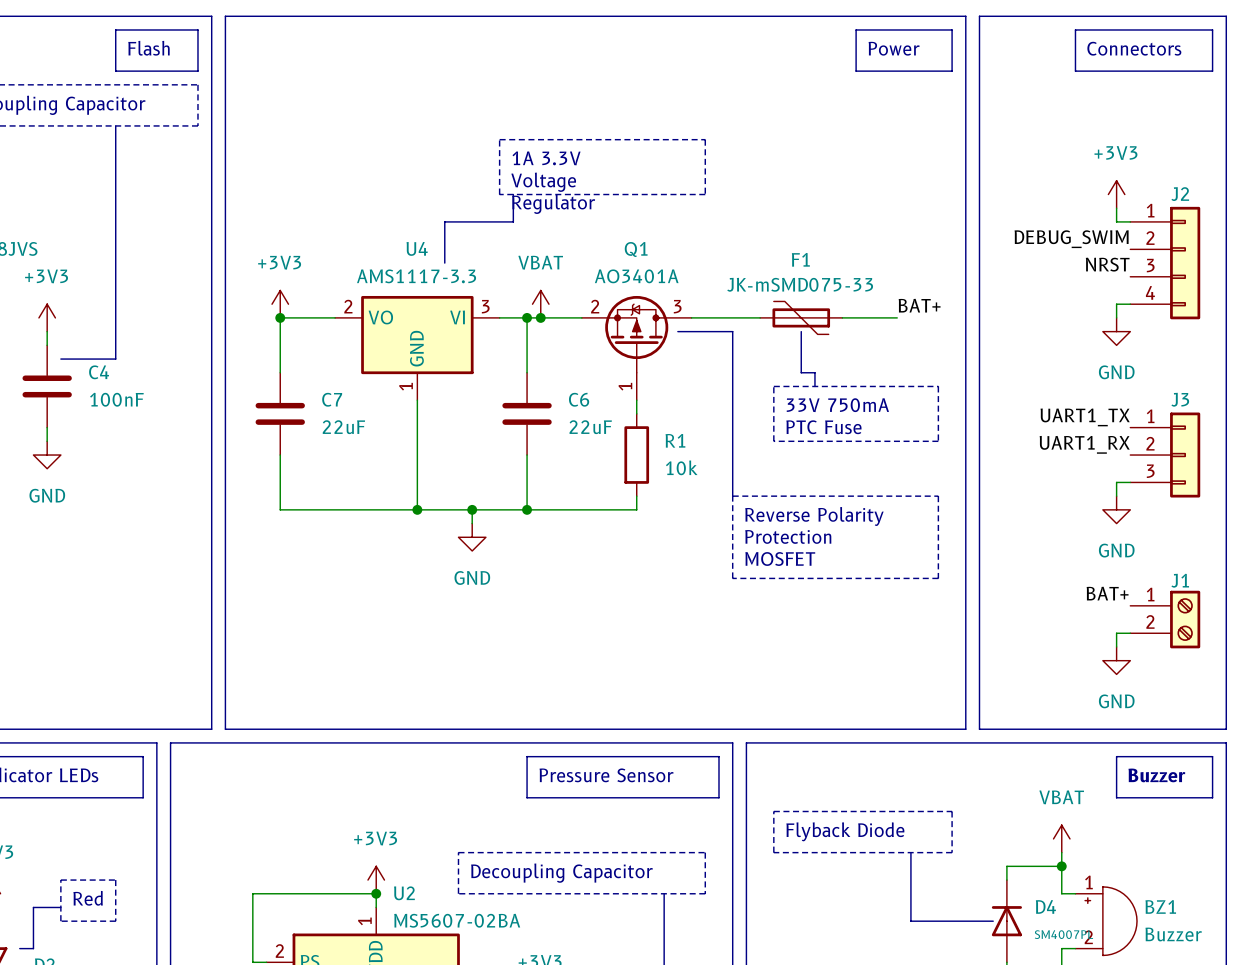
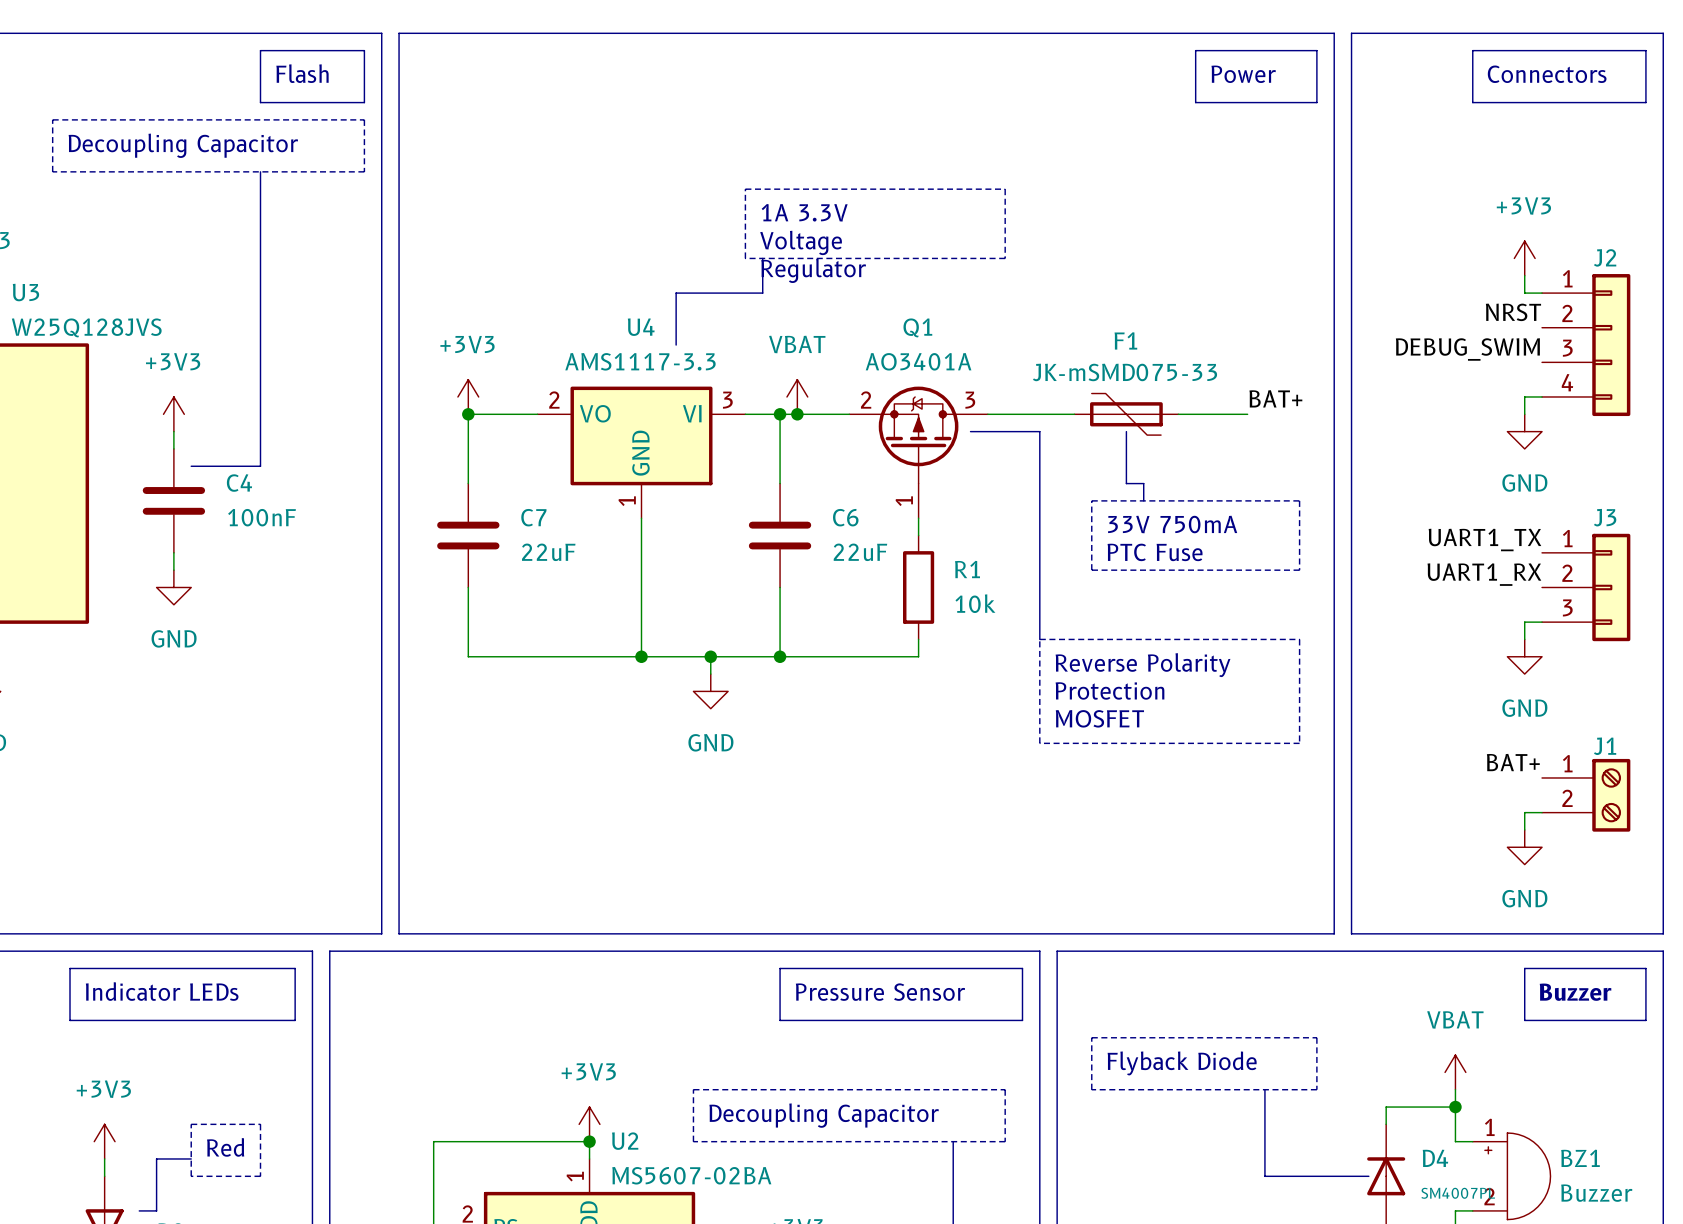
label: DEBUG_SWIM (1071, 239) -> NRST (1513, 312)
label: NRST (1107, 264) -> DEBUG_SWIM (1467, 349)

